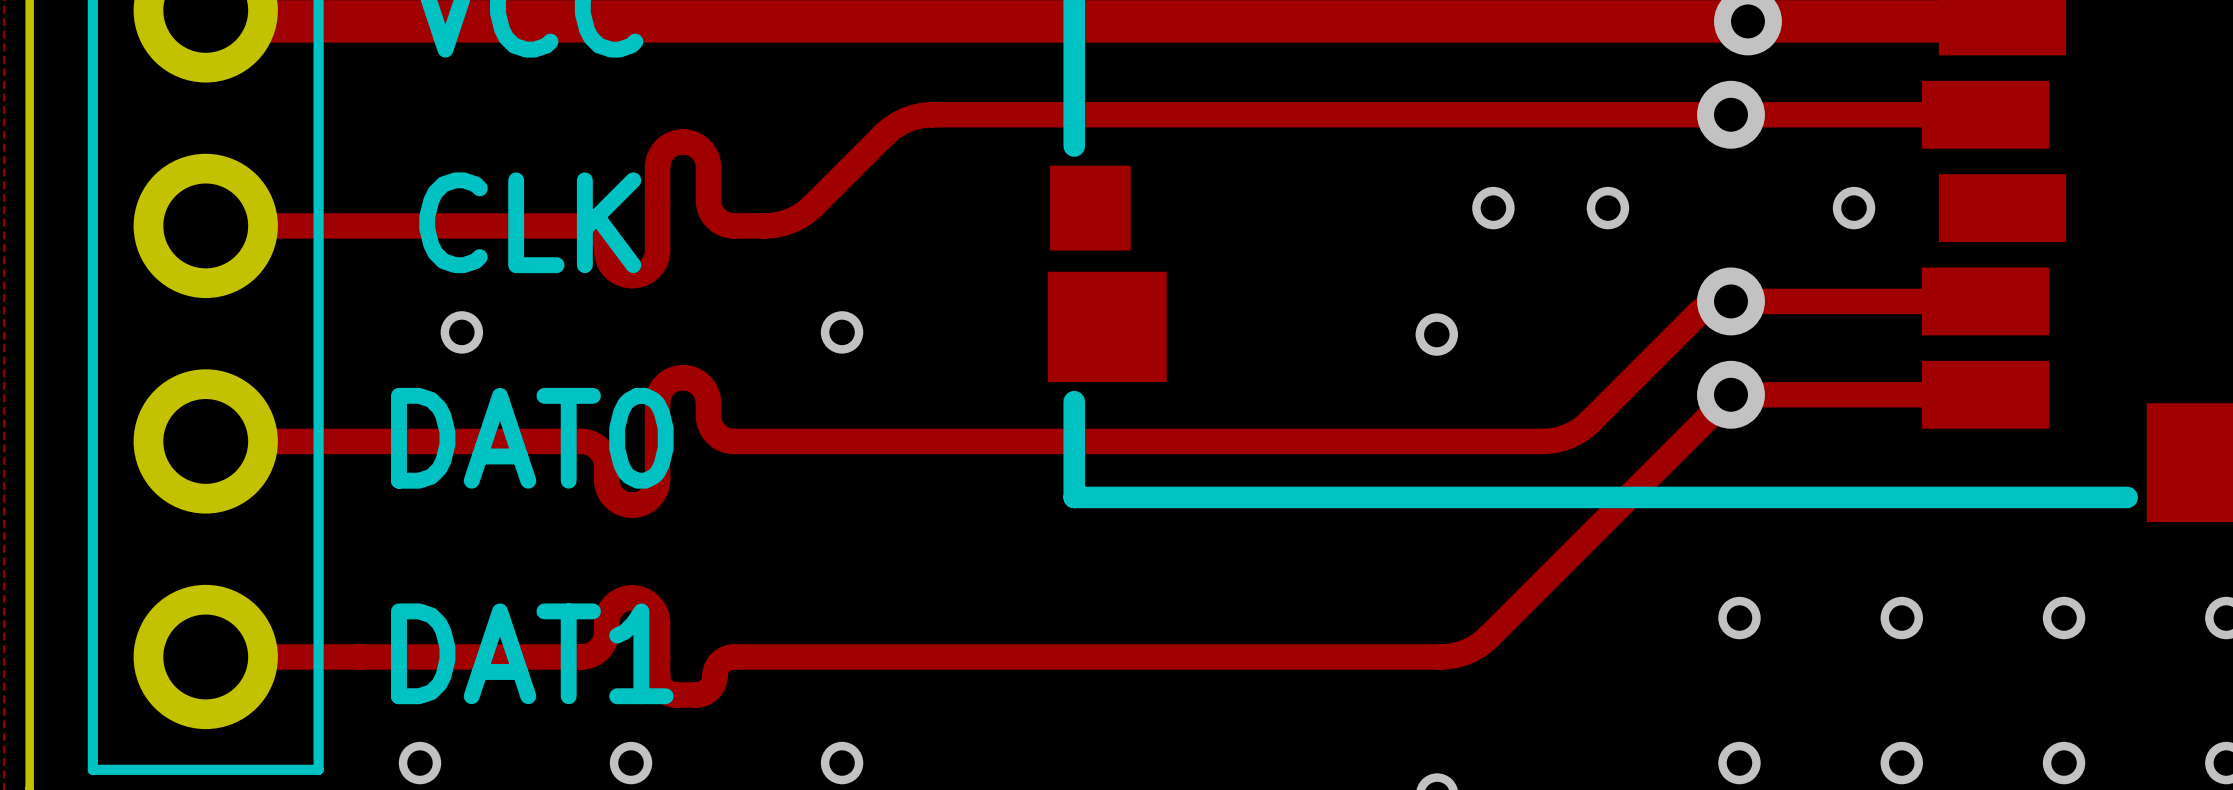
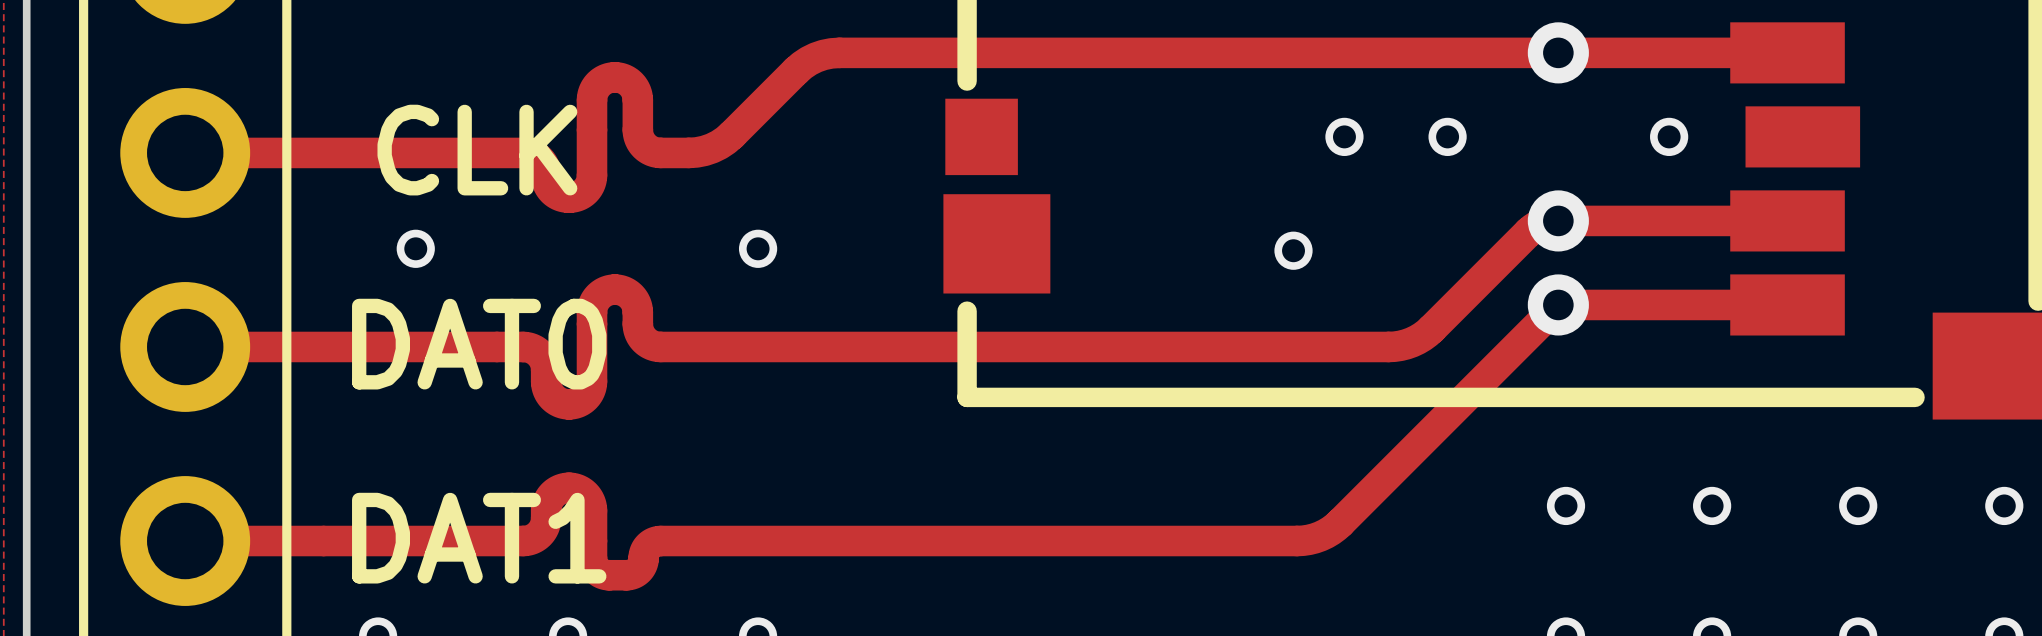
track width: thin (1985, 114) (923, 115) (906, 119) (891, 128) (806, 211) (782, 223) (764, 225) (730, 225) (715, 218) (708, 203) (706, 157) (695, 145) (679, 142) (667, 147) (658, 160) (656, 258) (648, 270) (632, 275) -> thick (1787, 52) (831, 53) (816, 57) (802, 65) (725, 140) (704, 150) (688, 152) (657, 152) (644, 146) (638, 133) (636, 91) (626, 80) (611, 77) (600, 82) (592, 94) (590, 182) (583, 192) (569, 197)
track width: thin (205, 225) (584, 226) (595, 229) (602, 237) (608, 258) (613, 268) (623, 274) (631, 275) -> thick (185, 152) (526, 153) (535, 156) (542, 163) (547, 182) (552, 191) (561, 196) (568, 197)
track width: thin (1985, 301) (1717, 302) (1698, 313) (1585, 426) (1568, 436) (1548, 441) (730, 441) (718, 436) (711, 428) (708, 419) (707, 396) (703, 387) (692, 379) (679, 377) (665, 385) (658, 396) (657, 479) (655, 489) (647, 499) (632, 505) (622, 503) (611, 495) (607, 486) (606, 463) (603, 454) (596, 446) (584, 441) (205, 441) -> thick (1787, 220) (1545, 222) (1528, 232) (1427, 333) (1411, 342) (1394, 346) (657, 346) (646, 342) (640, 335) (638, 327) (637, 306) (633, 298) (623, 291) (611, 289) (598, 296) (592, 306) (590, 390) (583, 399) (569, 404) (560, 402) (550, 395) (546, 387) (545, 366) (543, 358) (537, 351) (526, 347) (185, 346)
track width: thin (1985, 394) (1731, 394) (1488, 637) (1472, 648) (1447, 656) (733, 656) (724, 659) (718, 664) (713, 683) (705, 692) (698, 694) (674, 694) (665, 691) (658, 680) (657, 623) (655, 613) (644, 601) (632, 597) (622, 599) (611, 607) (607, 616) (606, 634) (603, 644) (593, 653) (584, 656) (205, 656) -> thick (1787, 304) (1558, 304) (1340, 523) (1325, 533) (1302, 540) (660, 541) (652, 543) (647, 547) (642, 564) (635, 572) (628, 575) (606, 575) (598, 571) (592, 562) (590, 501) (580, 490) (569, 487) (560, 489) (550, 496) (546, 504) (545, 521) (543, 529) (534, 537) (526, 540) (185, 541)

